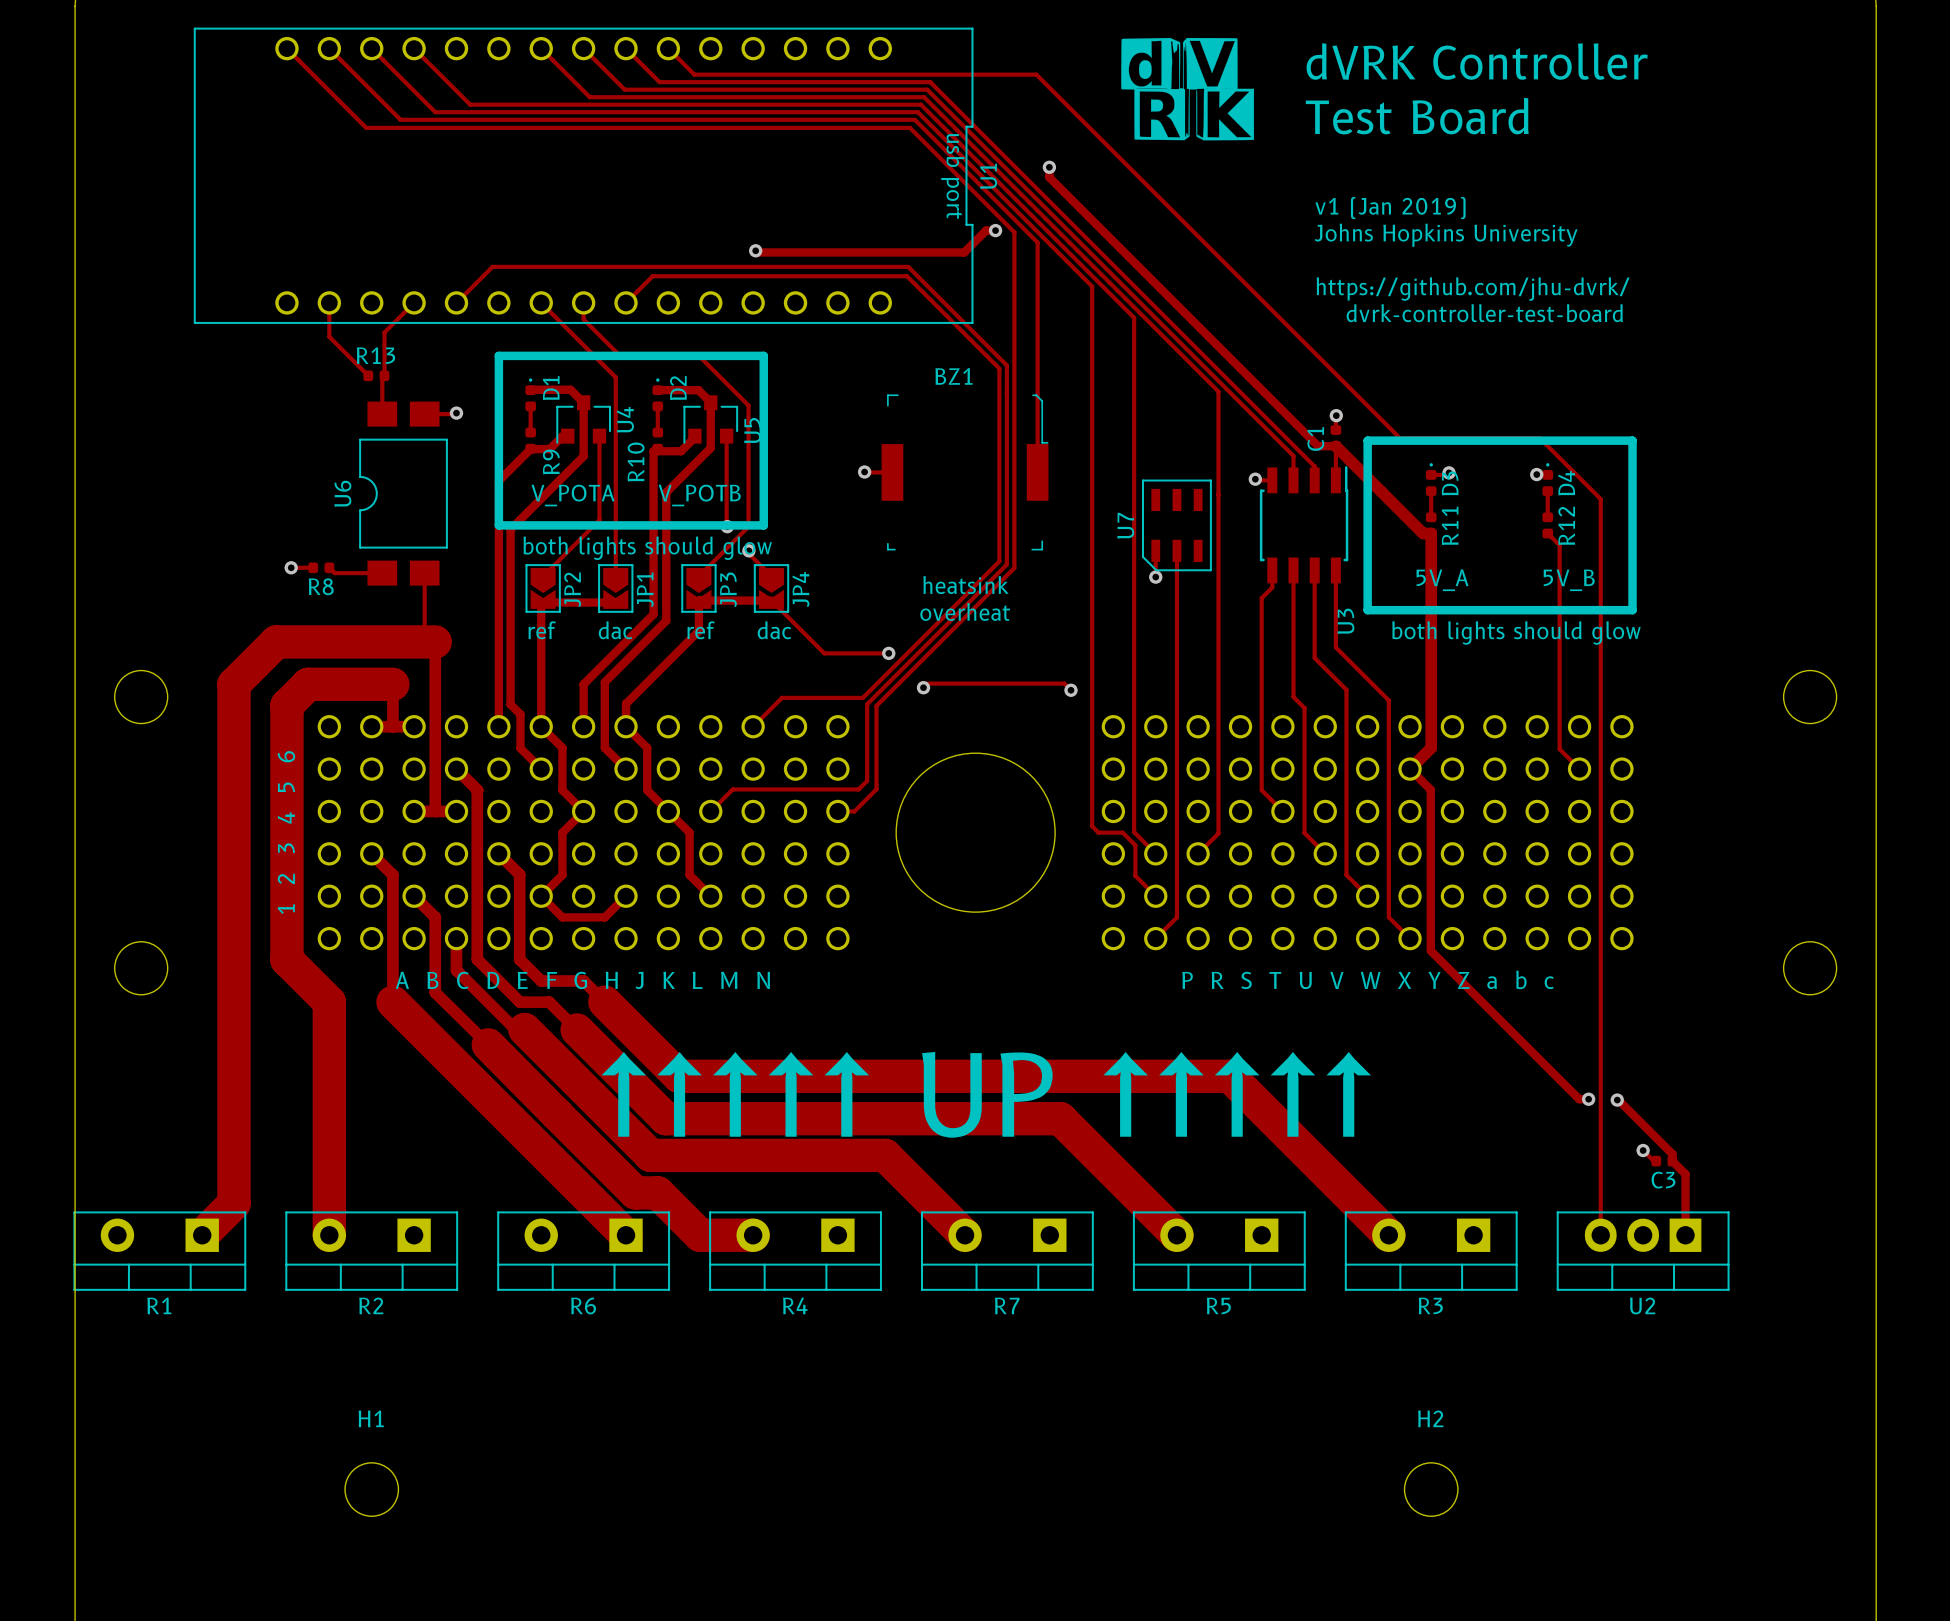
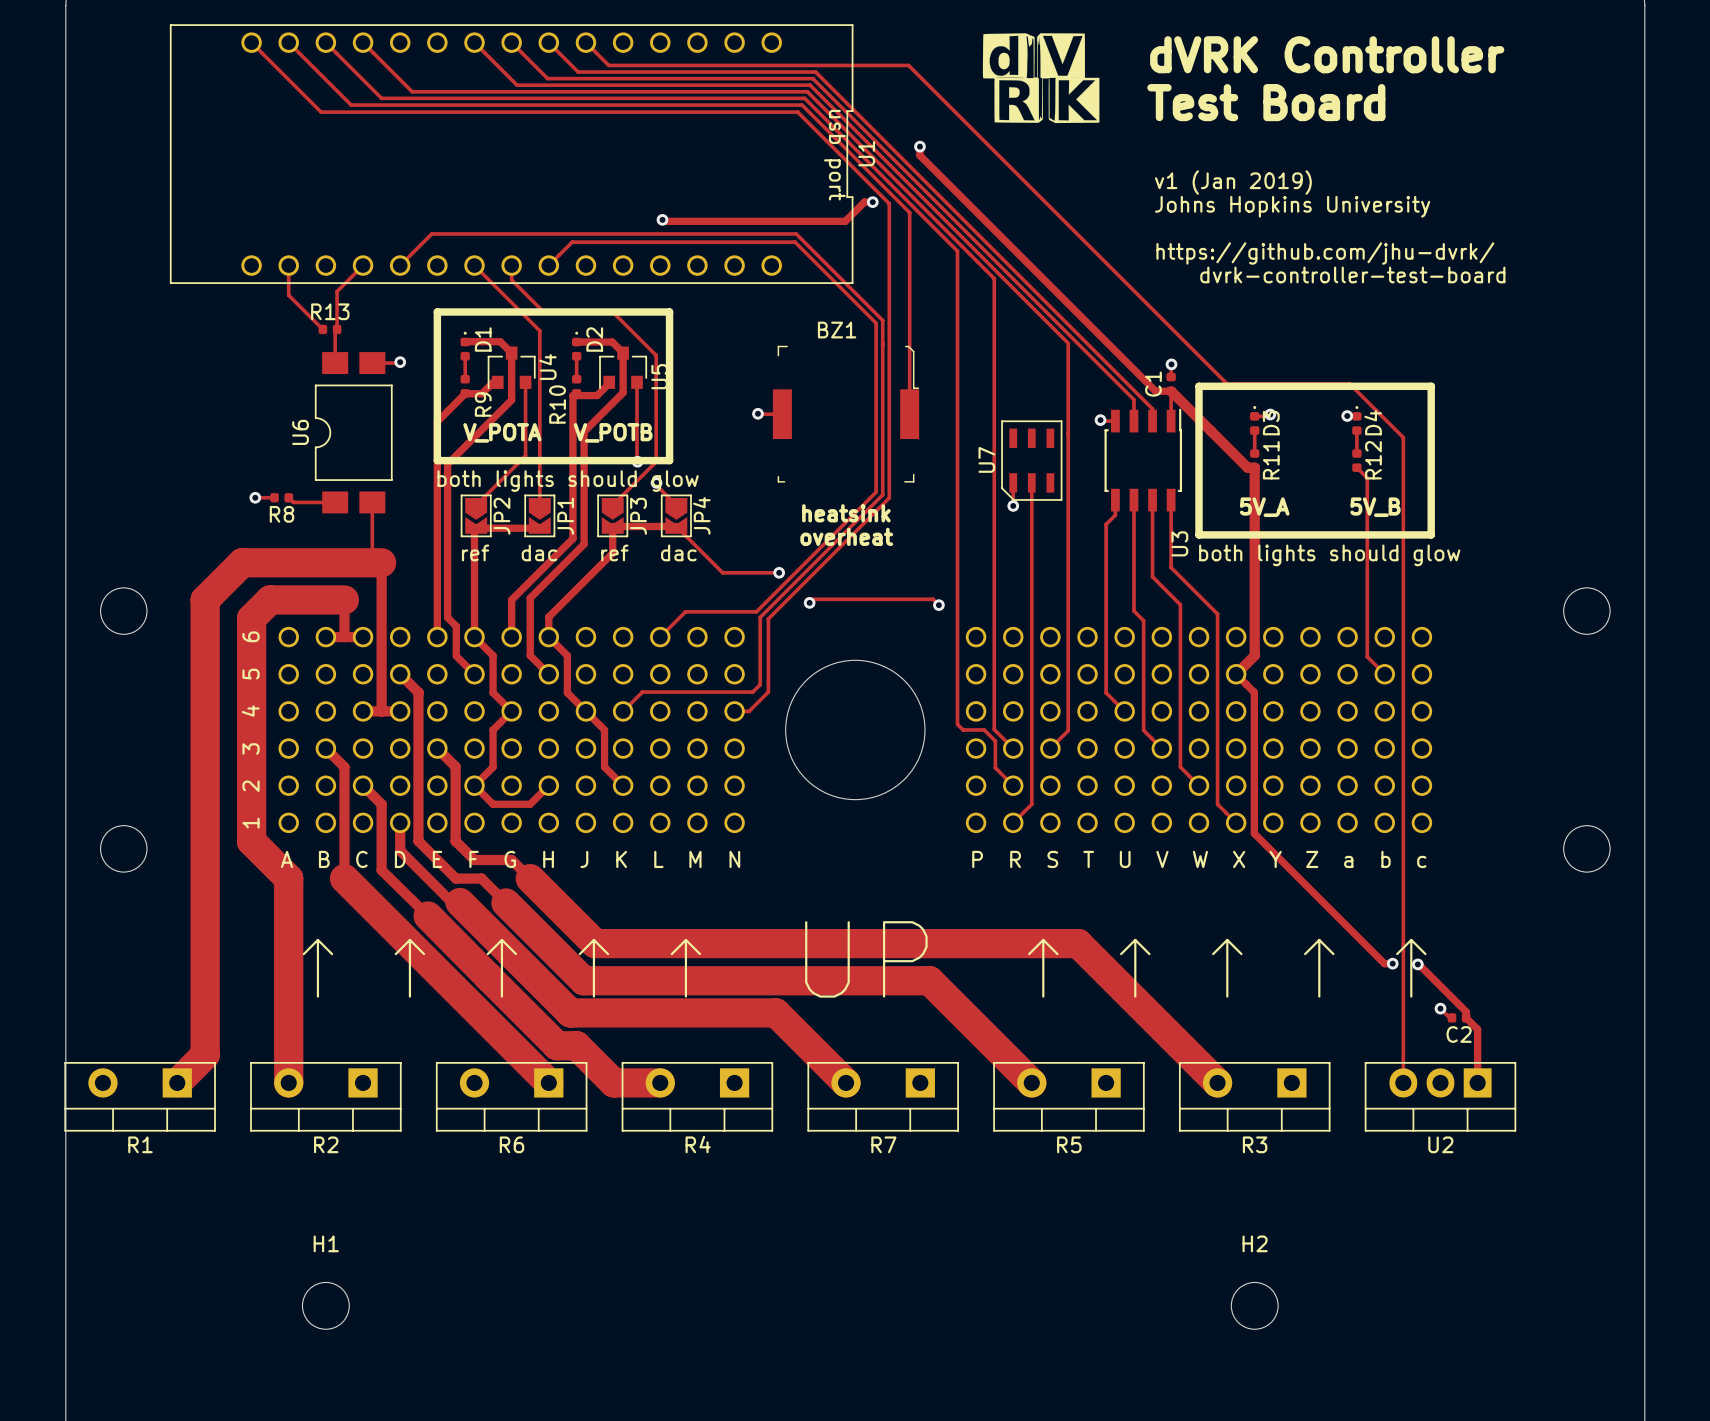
C3 name: C3 (1663, 1180) -> C2 (1459, 1034)

